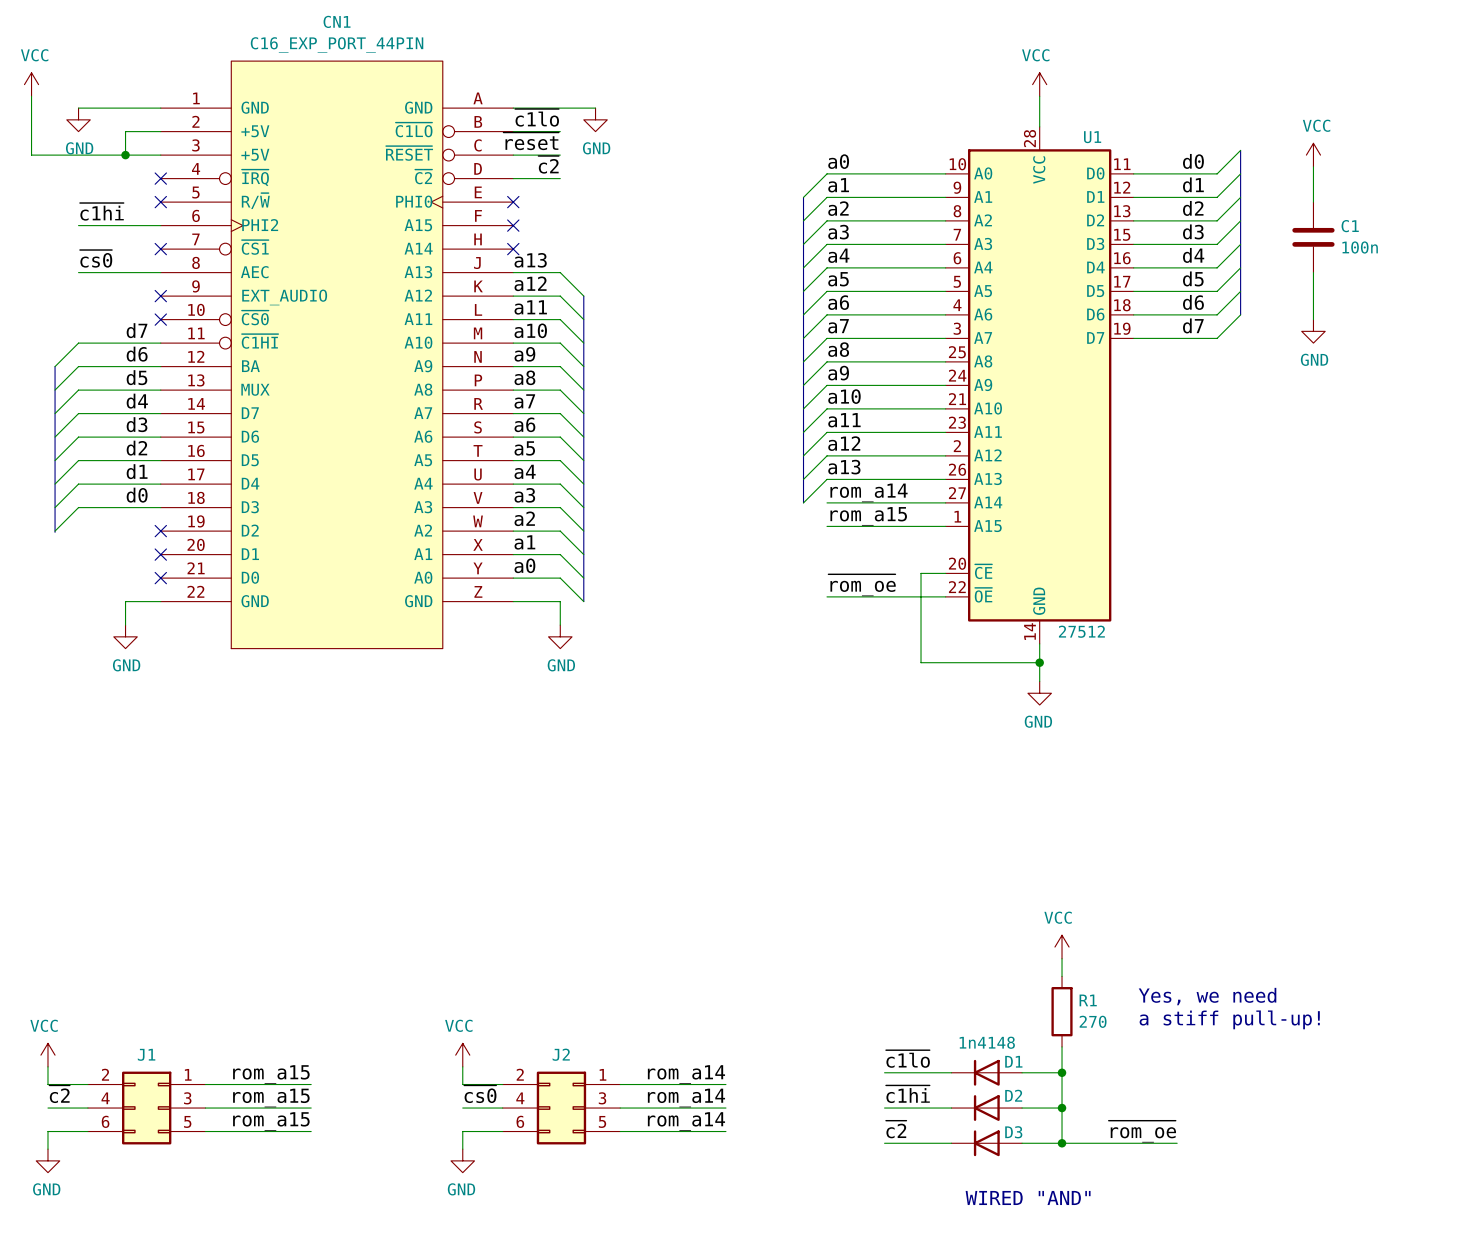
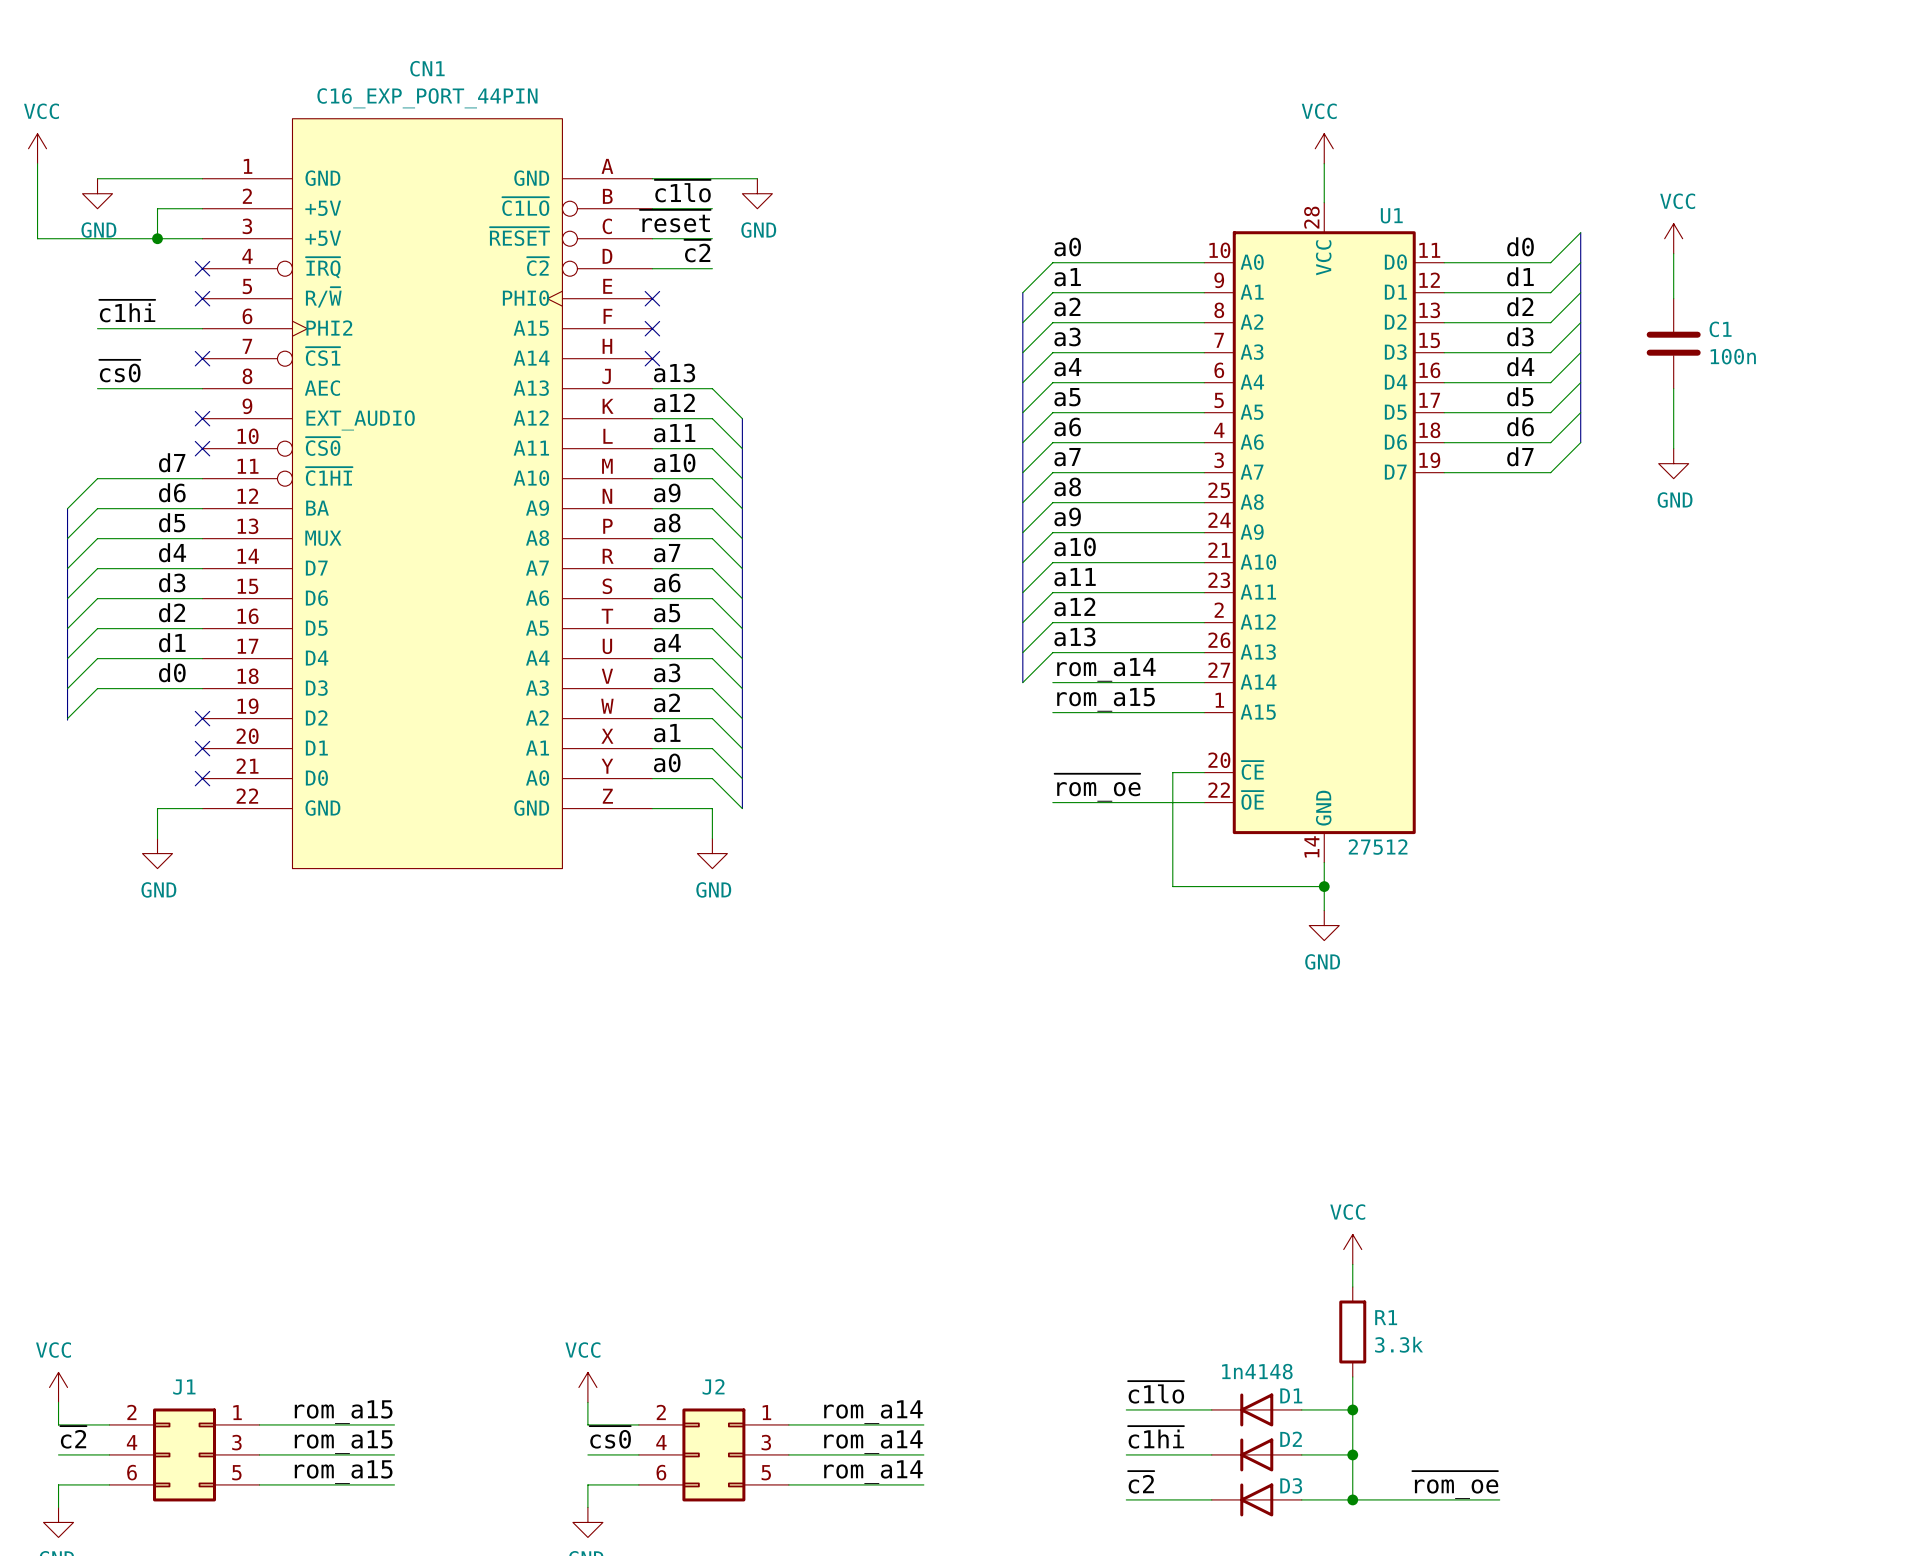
text: Yes, we need (1207, 996) -> none
text: a stiff pull-up! (1229, 1019) -> none
R1 value: 270 (1093, 1021) -> 3.3k (1399, 1344)

